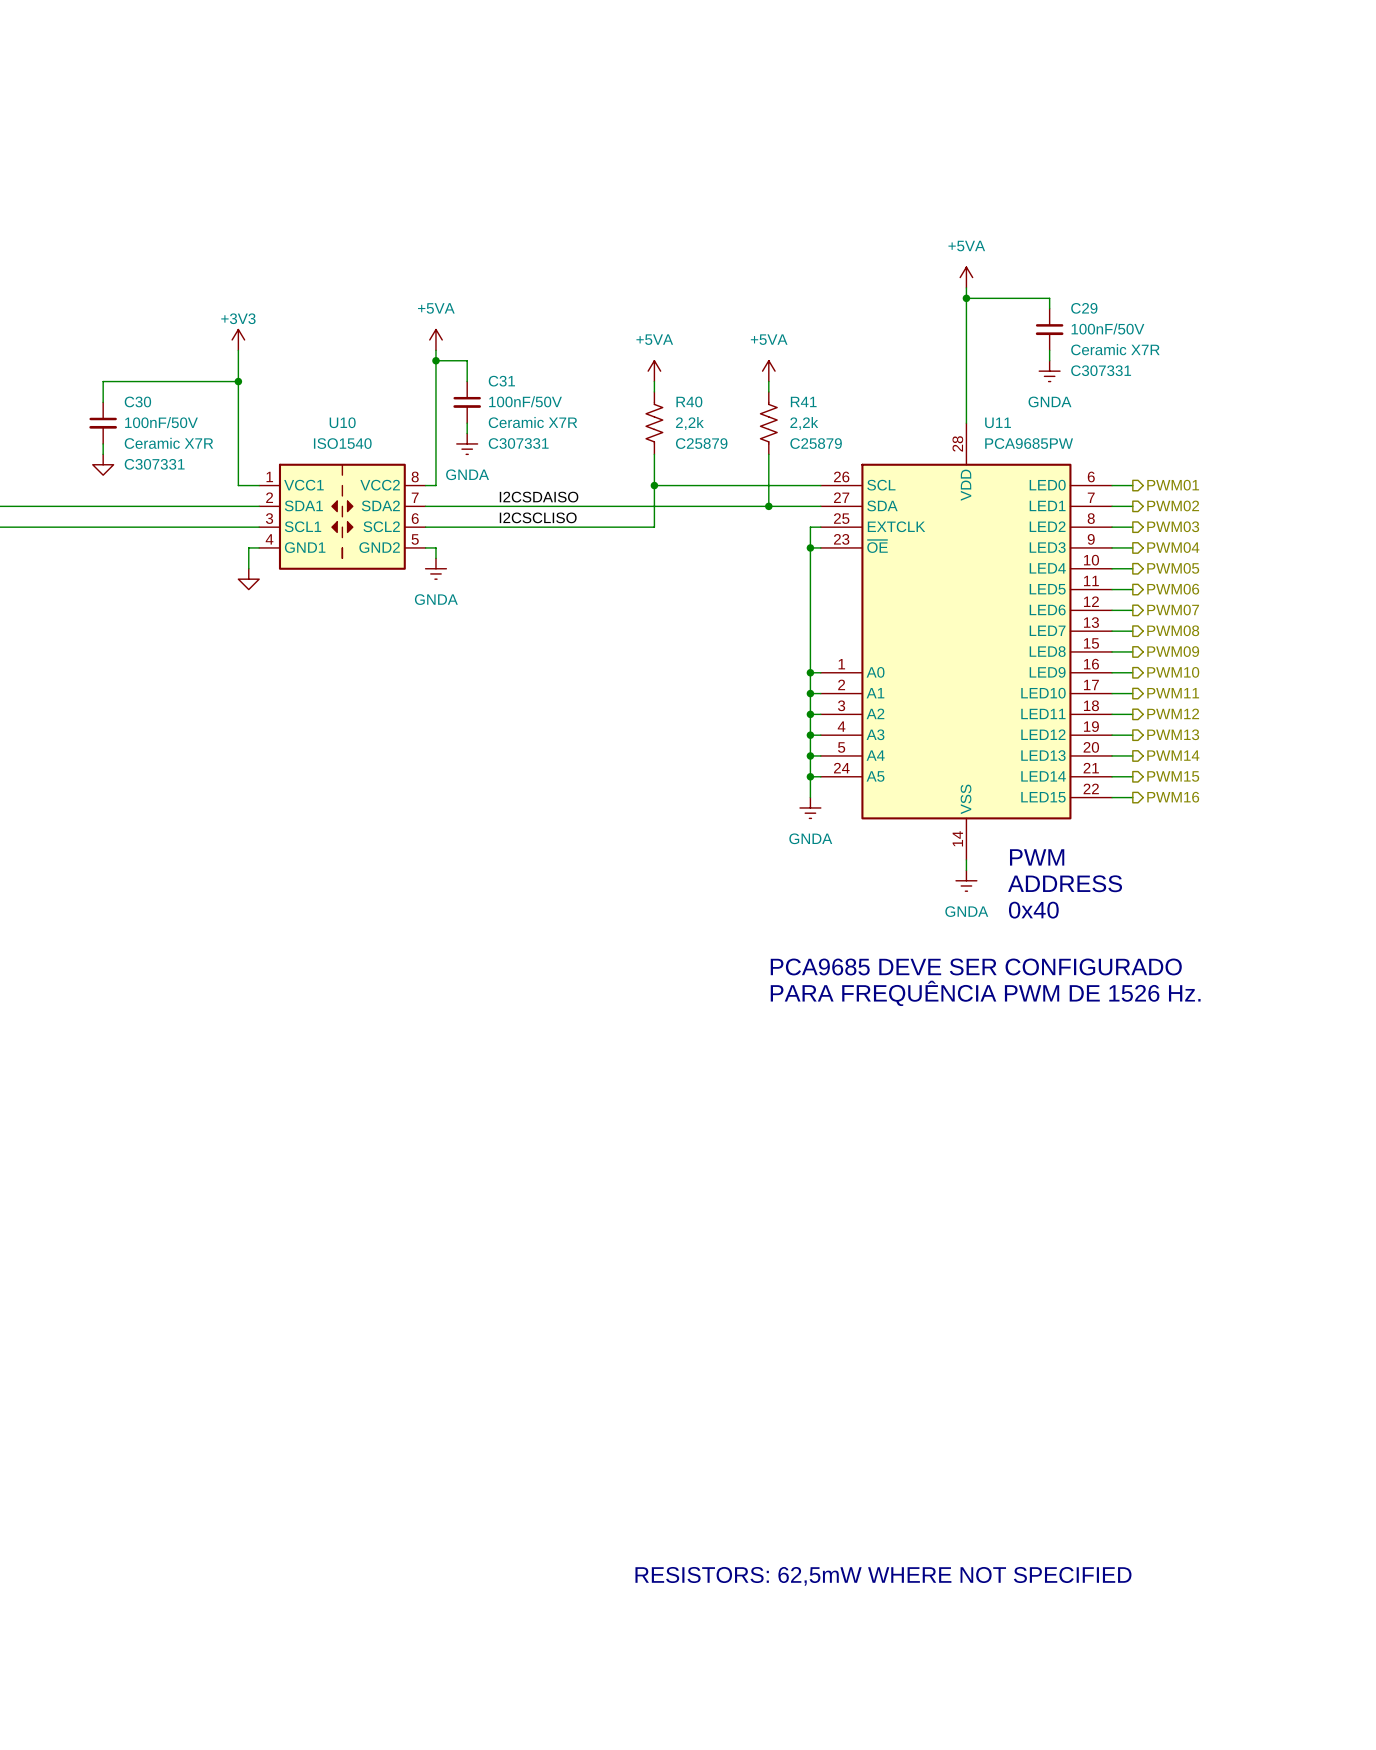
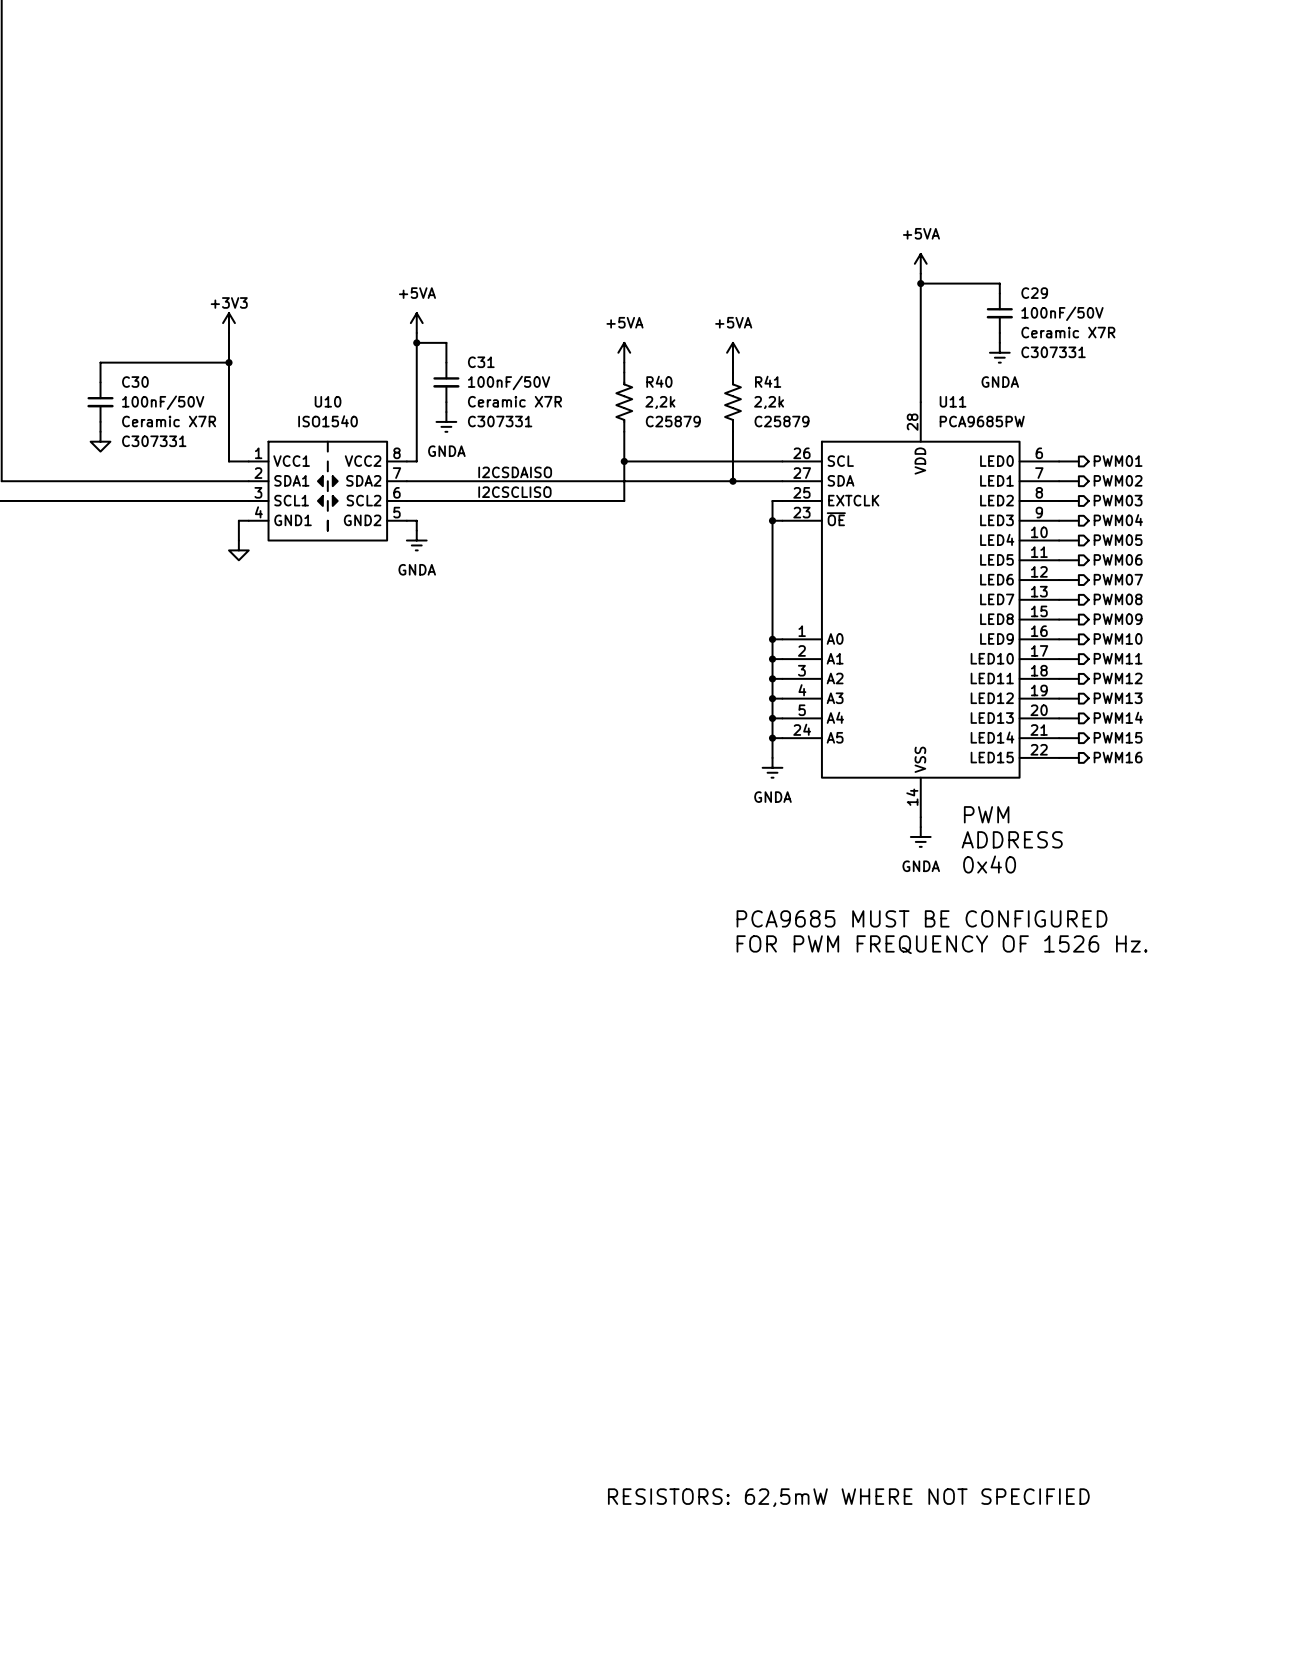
text: PCA9685 DEVE SER CONFIGURADO (976, 966) -> PCA9685 MUST BE CONFIGURED (922, 918)
text: PARA FREQUÊNCIA PWM DE 1526 Hz. (985, 993) -> FOR PWM FREQUENCY OF 1526 Hz. (942, 944)

